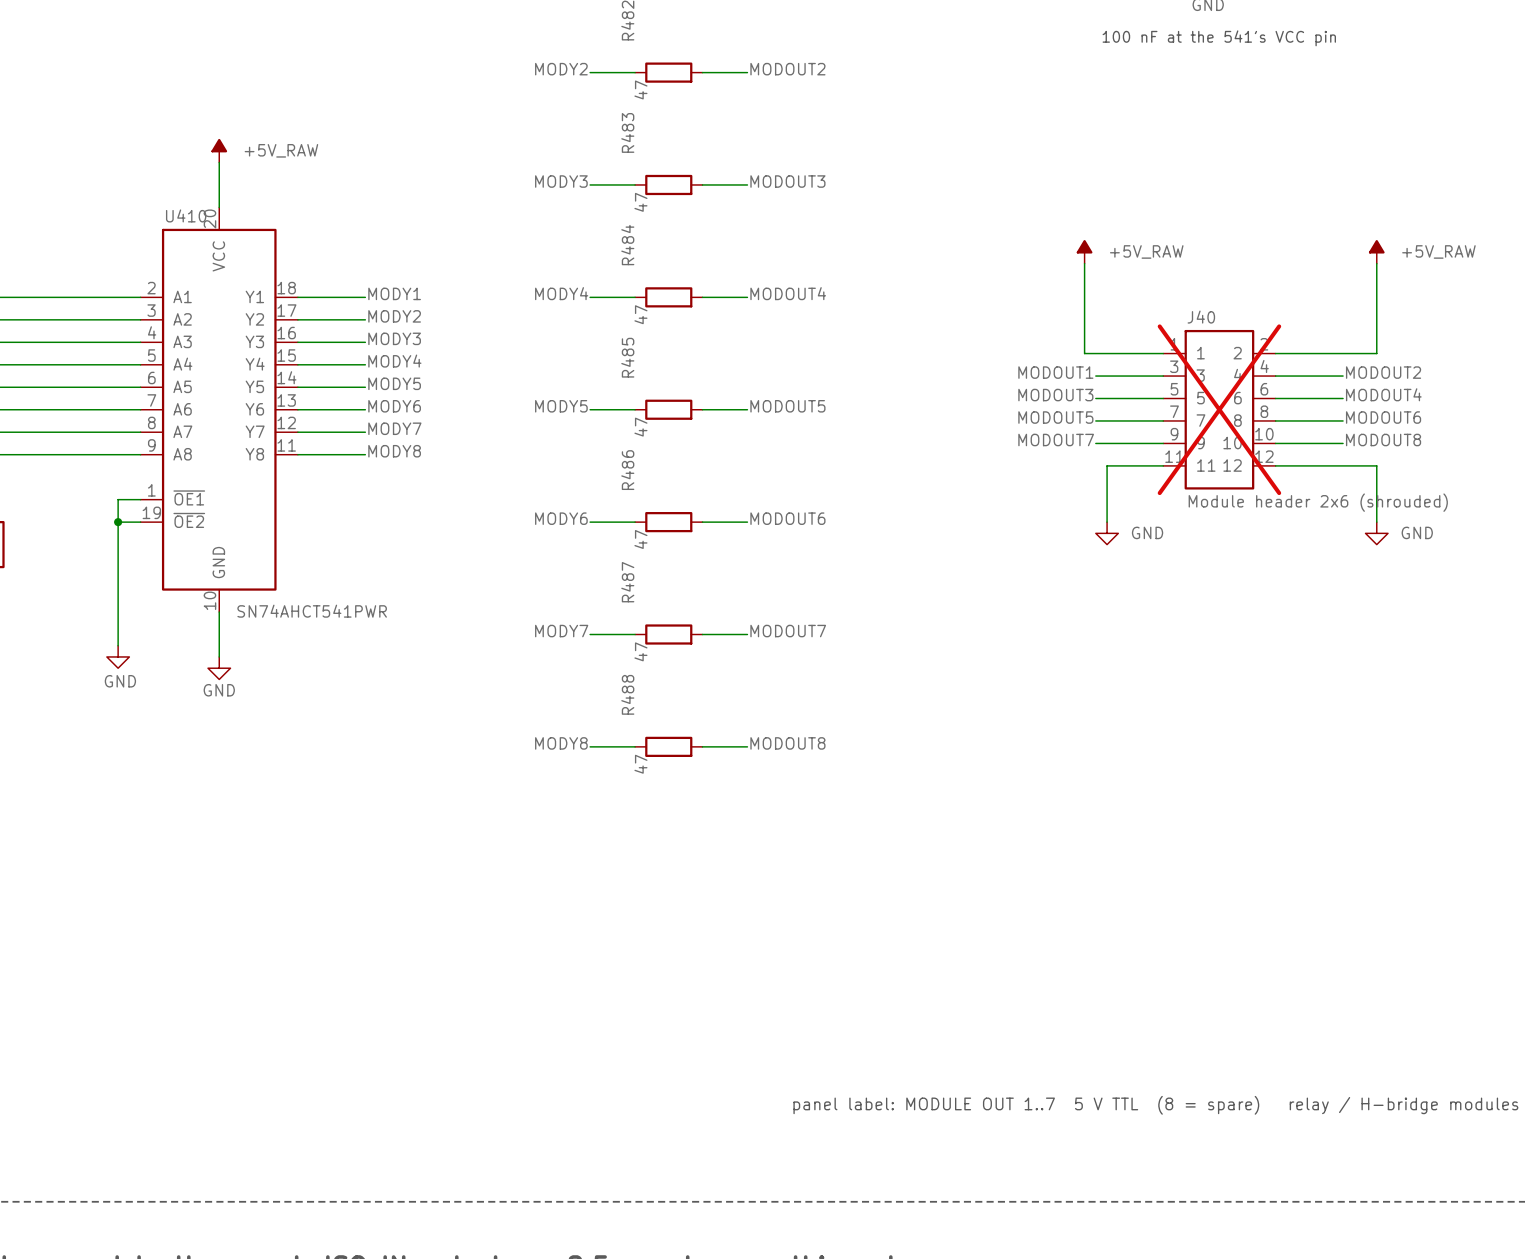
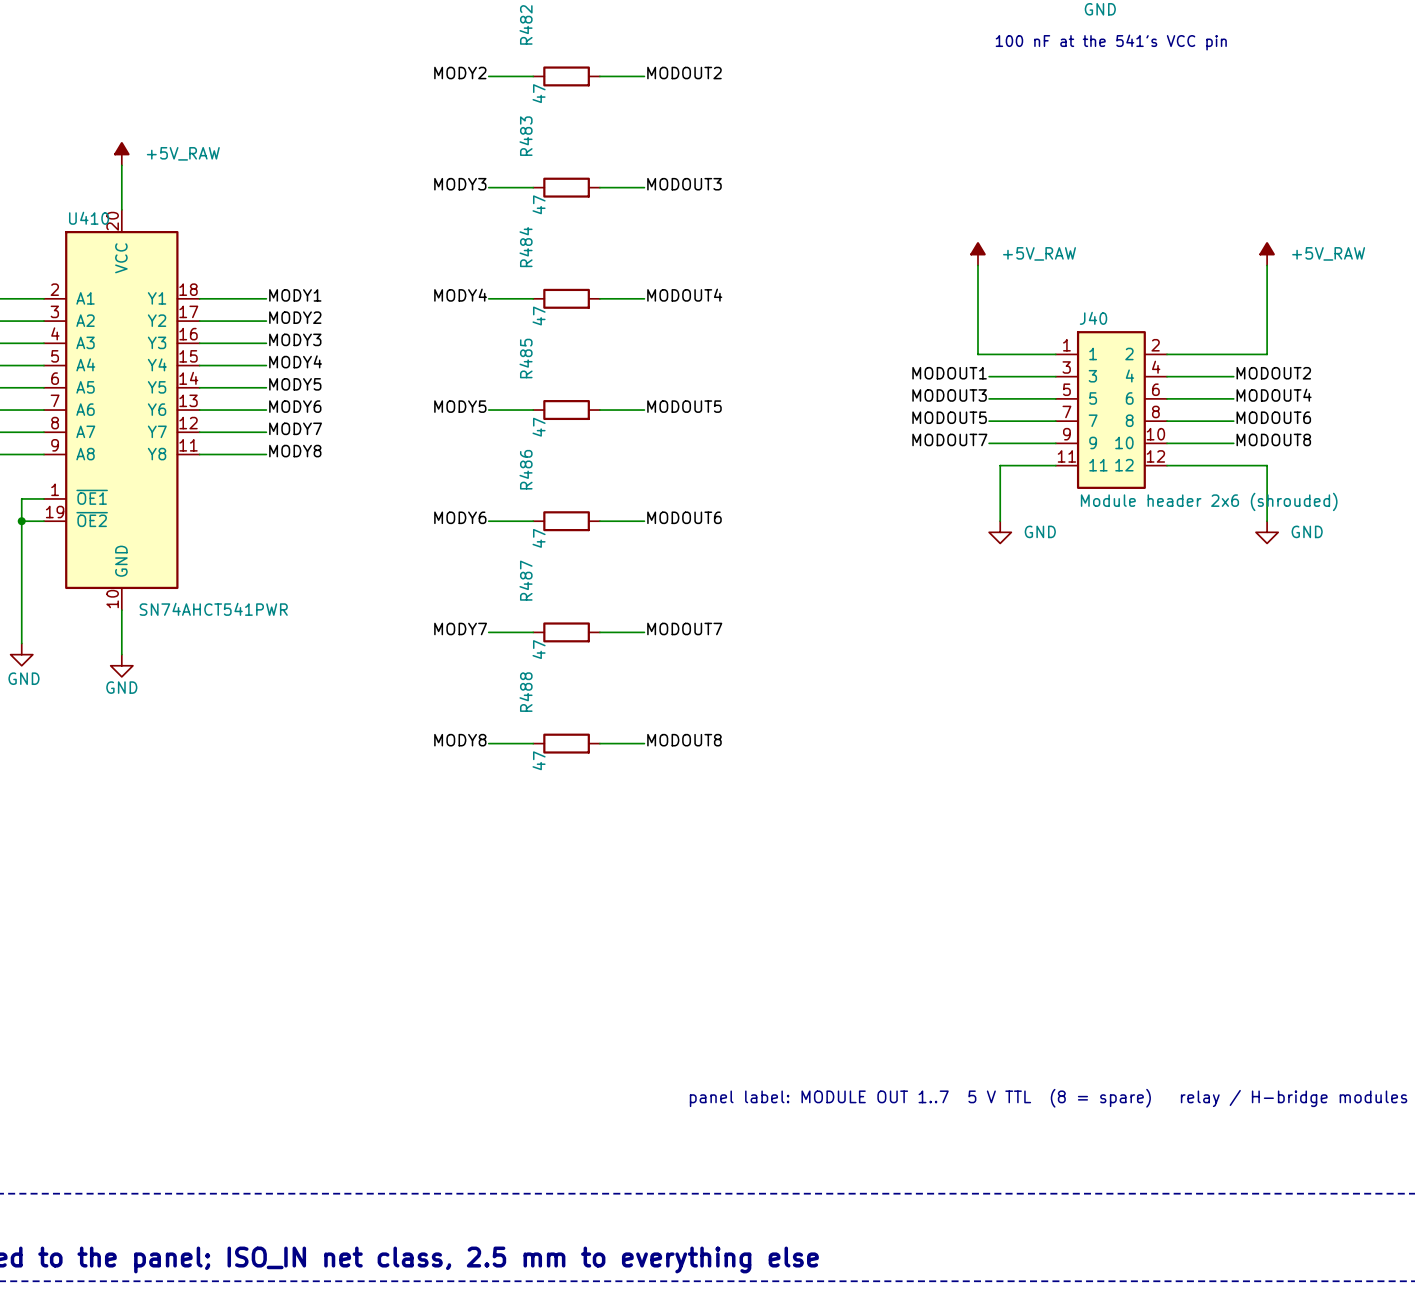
J40 do-not-place cross: (1219, 409) -> none

